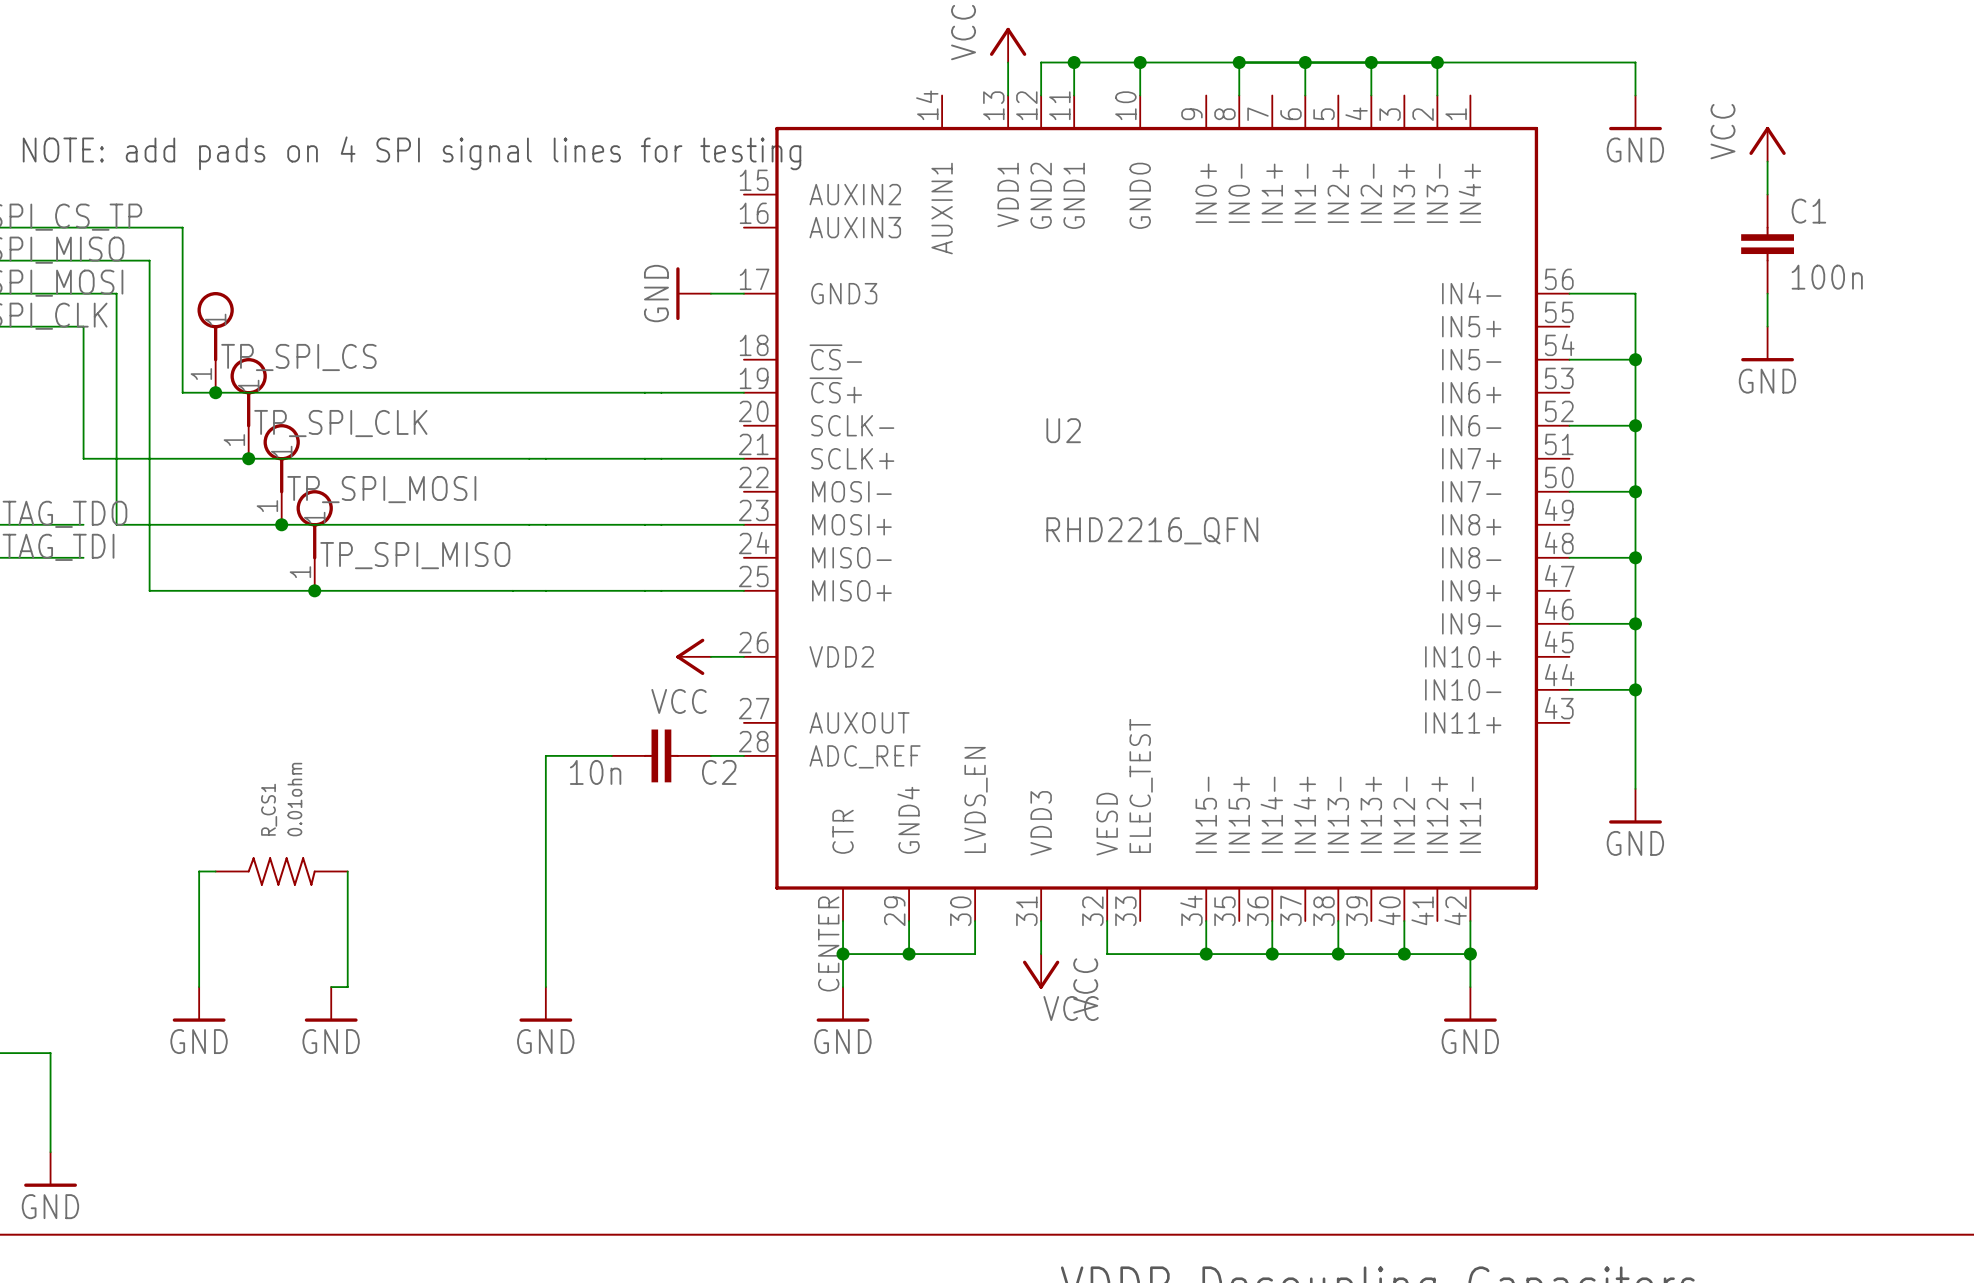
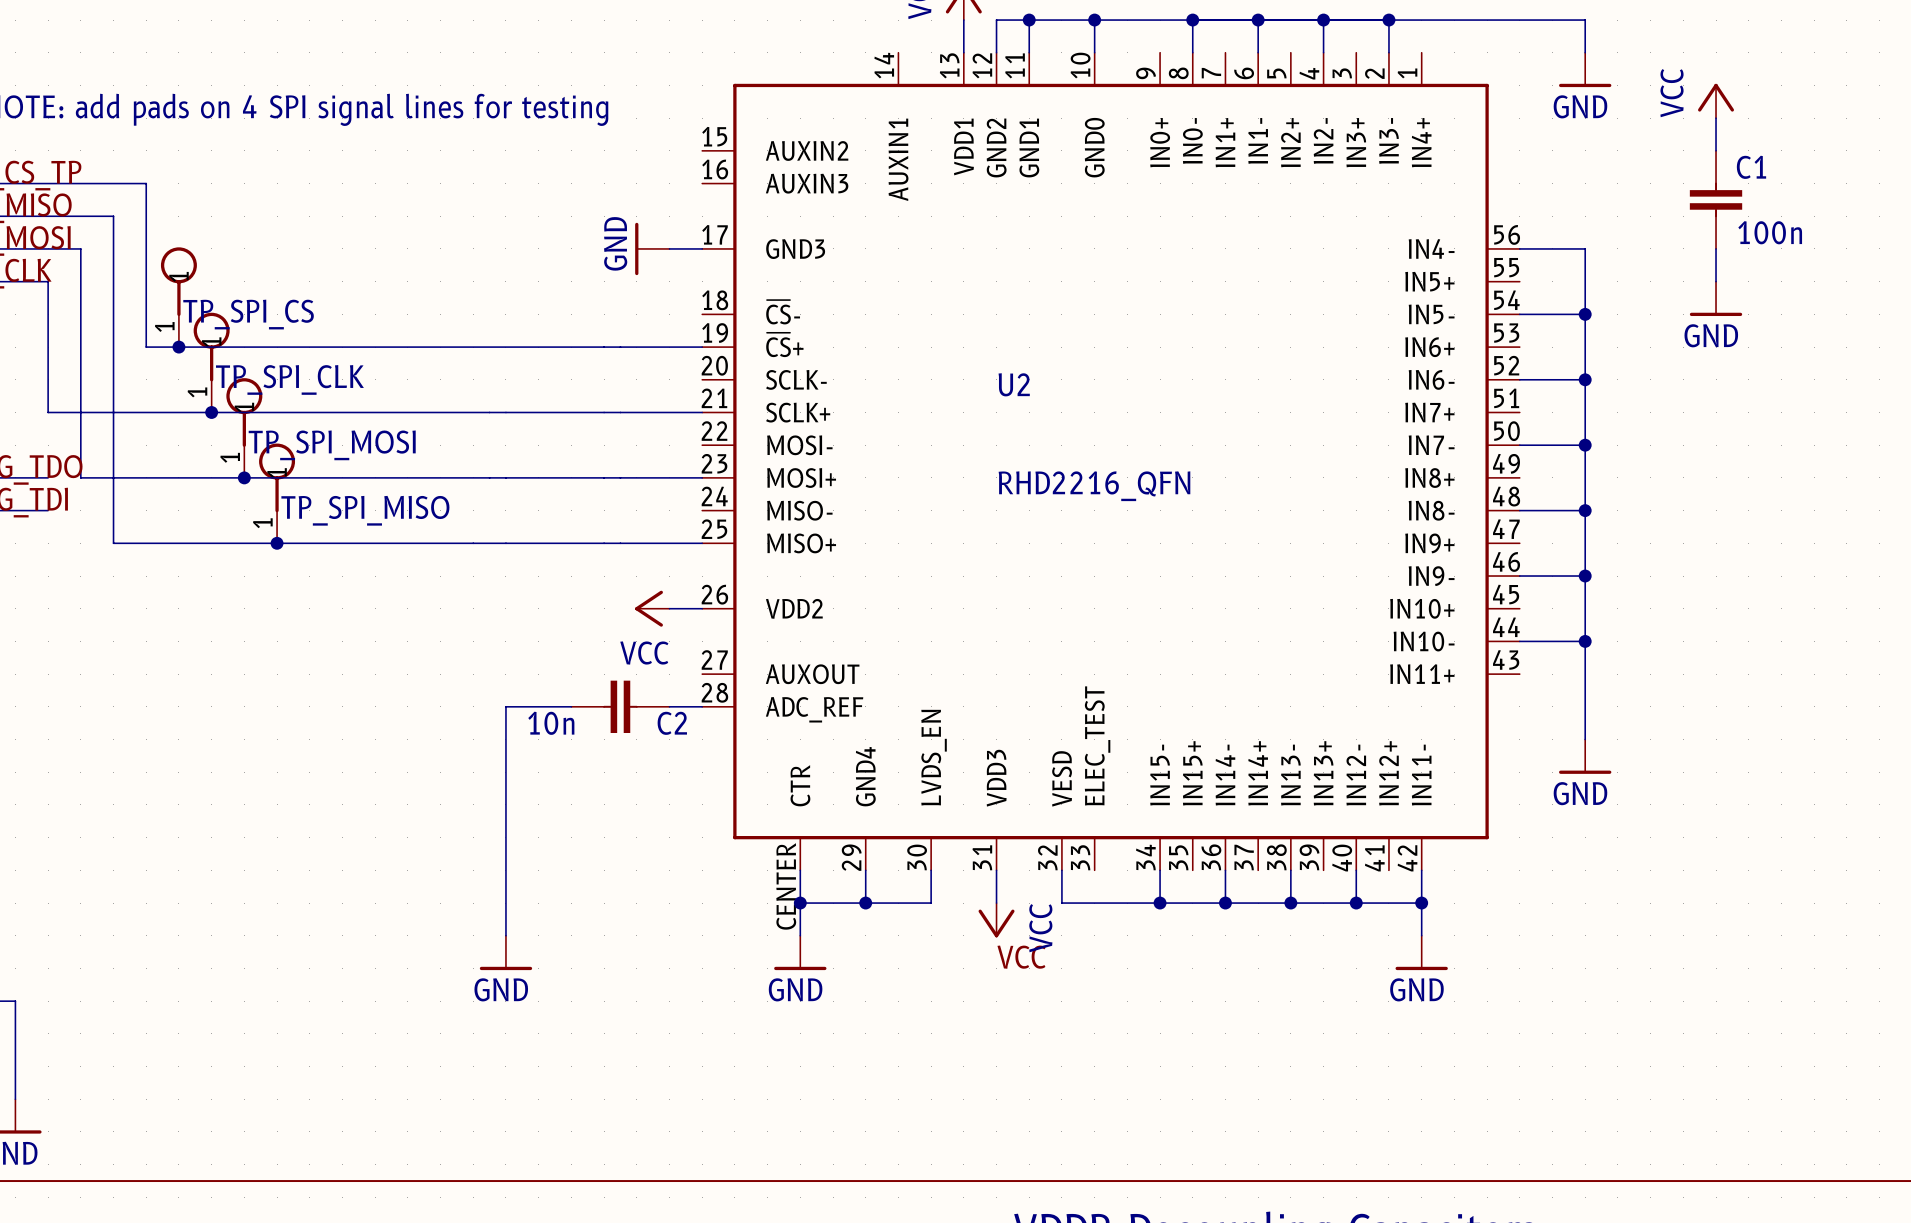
wire: (215, 871) (199, 871) (199, 987) -> none
R_CS1: 0.01ohm (281, 871) -> none
wire: (347, 871) (347, 987) (331, 987) -> none
power symbol: GND (199, 1004) -> none
power symbol: GND (331, 1004) -> none

